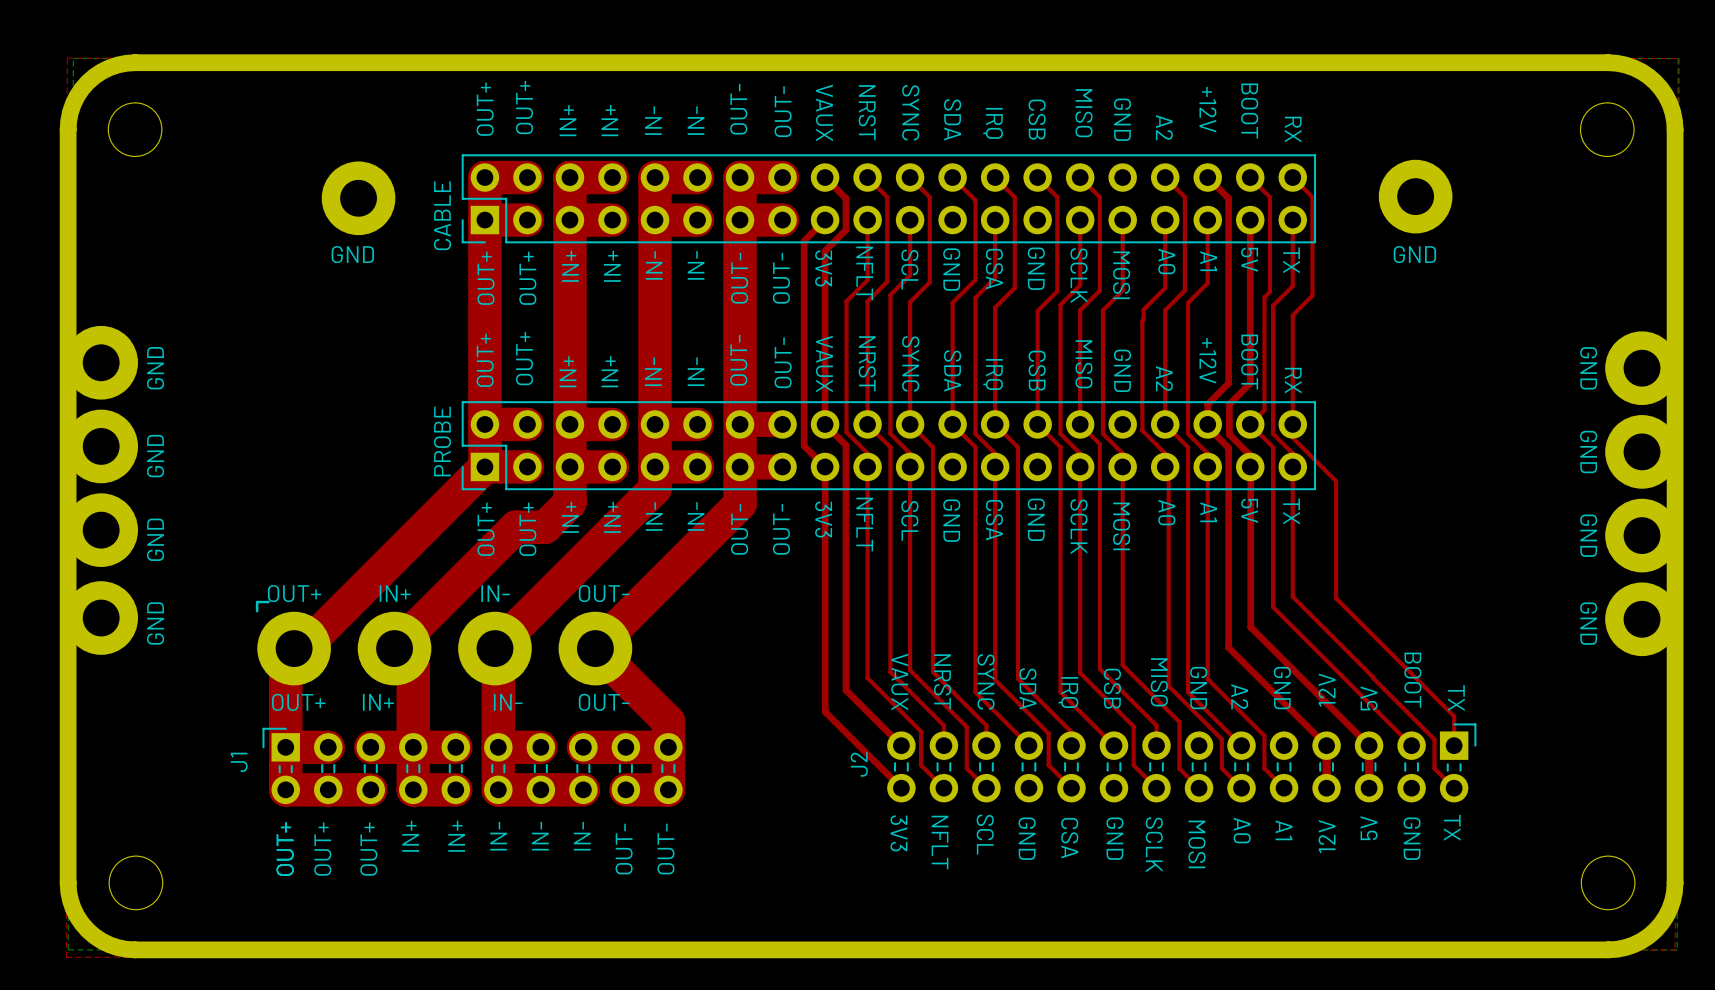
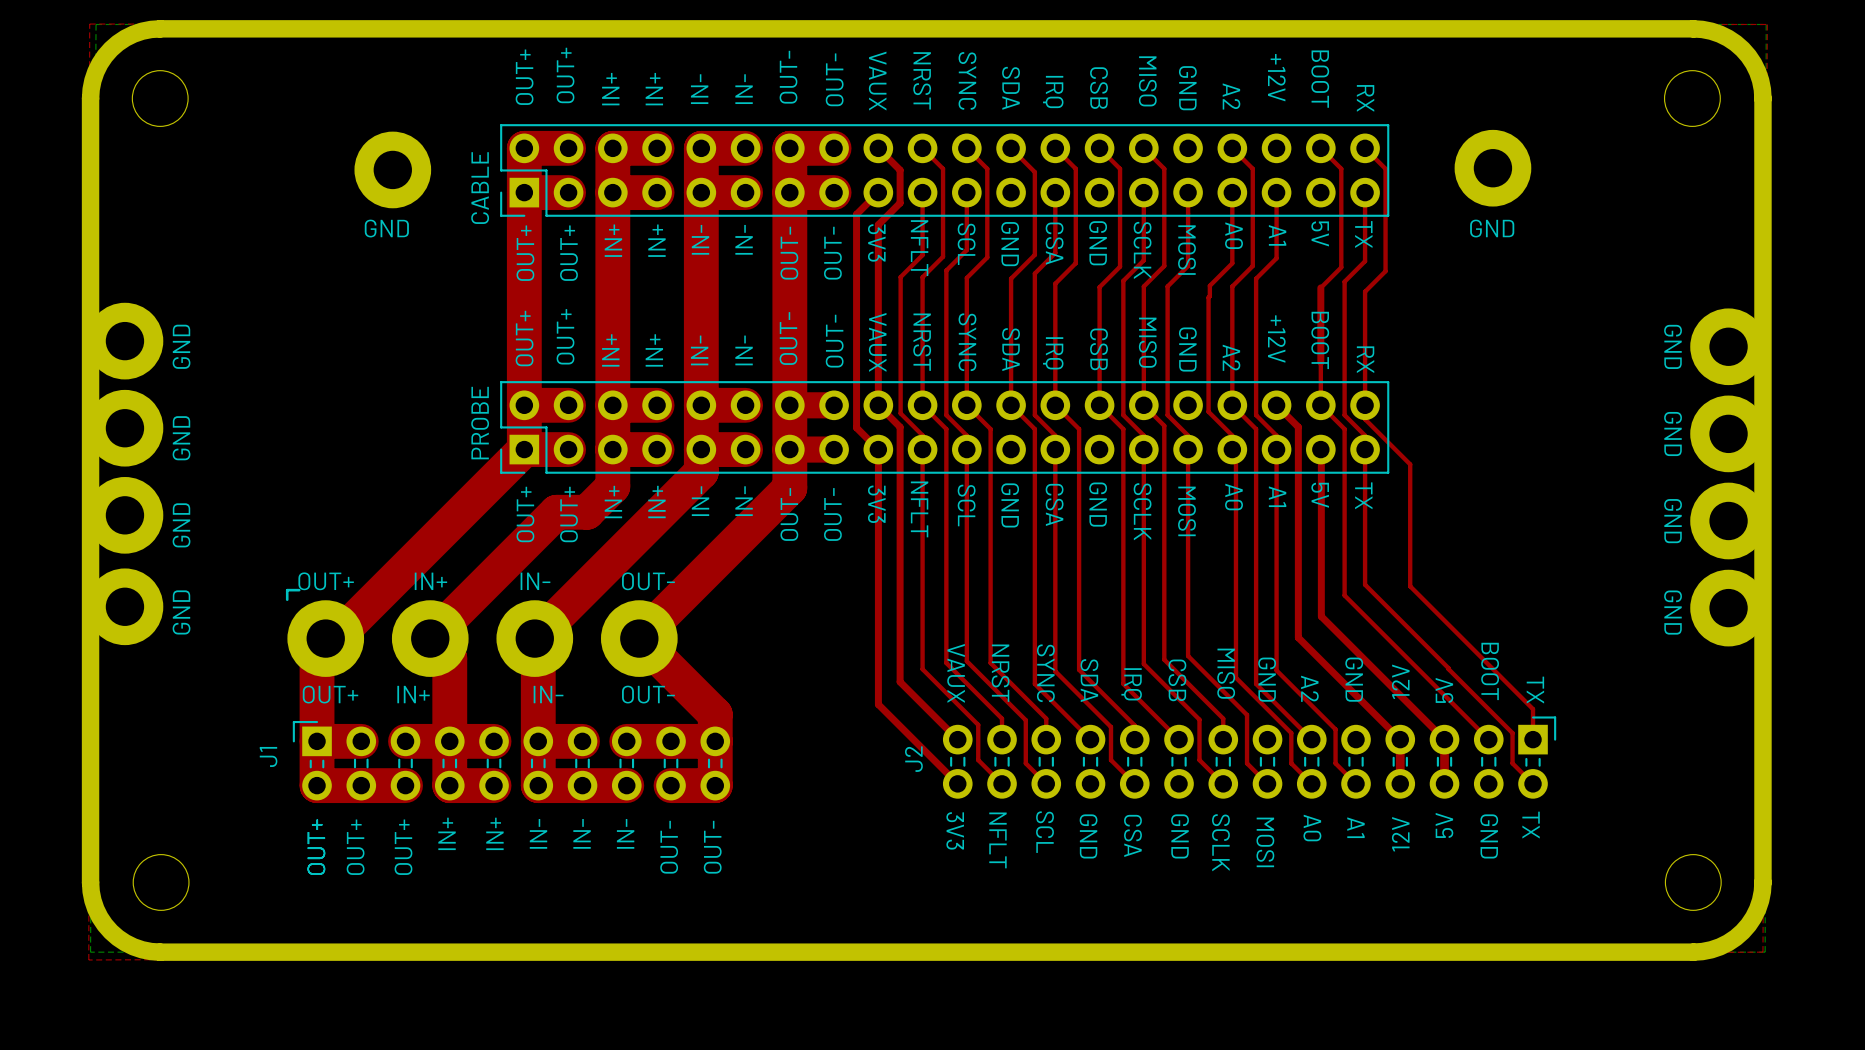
top track: (1207, 177) (1228, 198) (1228, 383) (1207, 404) (1207, 427) (1228, 448) -> (1276, 405) (1298, 427) (1298, 429)
top track: (1250, 220) (1250, 311) -> (1335, 273) (1320, 287)
top track: (1264, 297) (1264, 410) (1250, 424) -> none
top track: (1250, 383) (1229, 404) (1229, 434) (1250, 455) (1250, 466) -> (1320, 362) (1320, 405)

